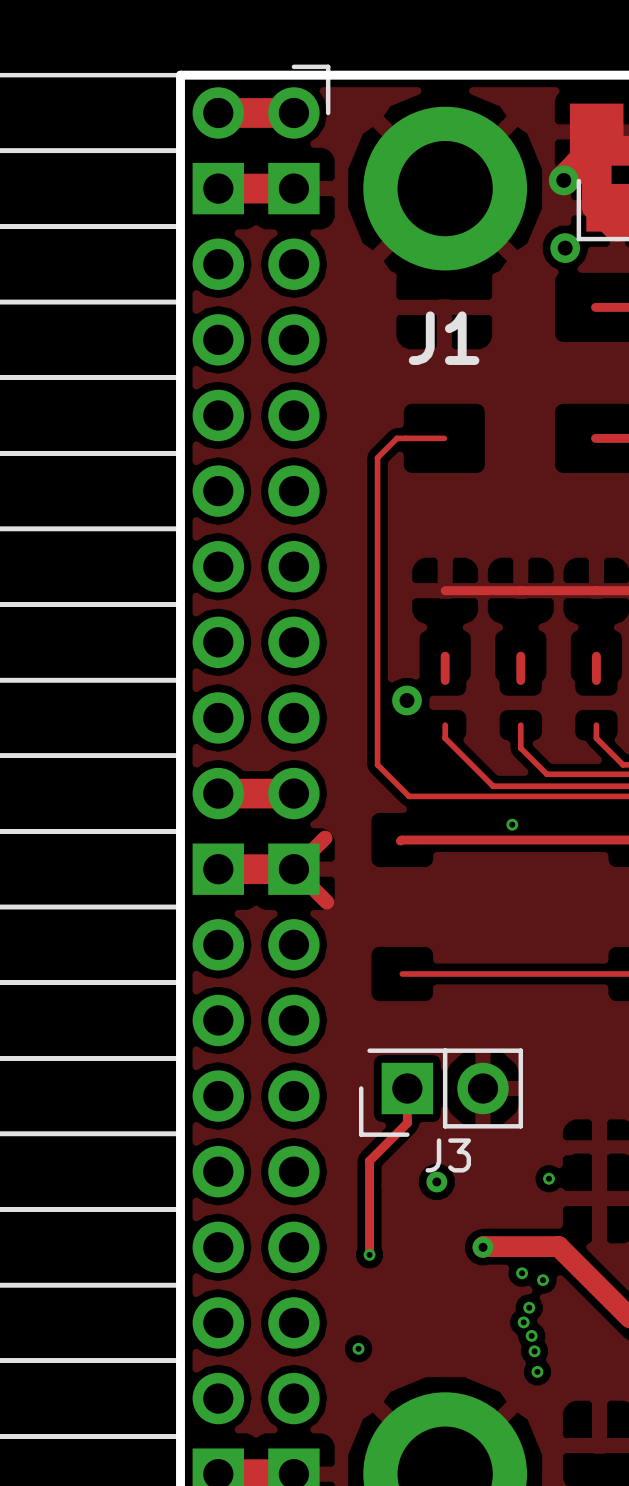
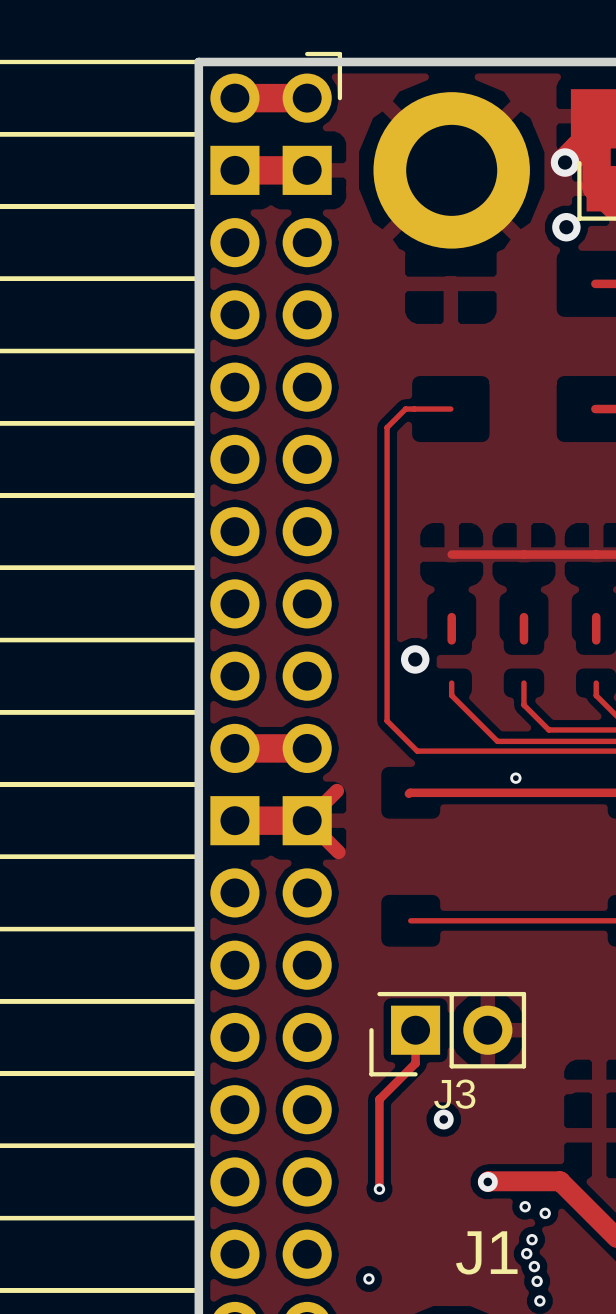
J1 name position: J1 (444, 338) -> J1 (486, 1252)
via: (548, 1178) -> none

